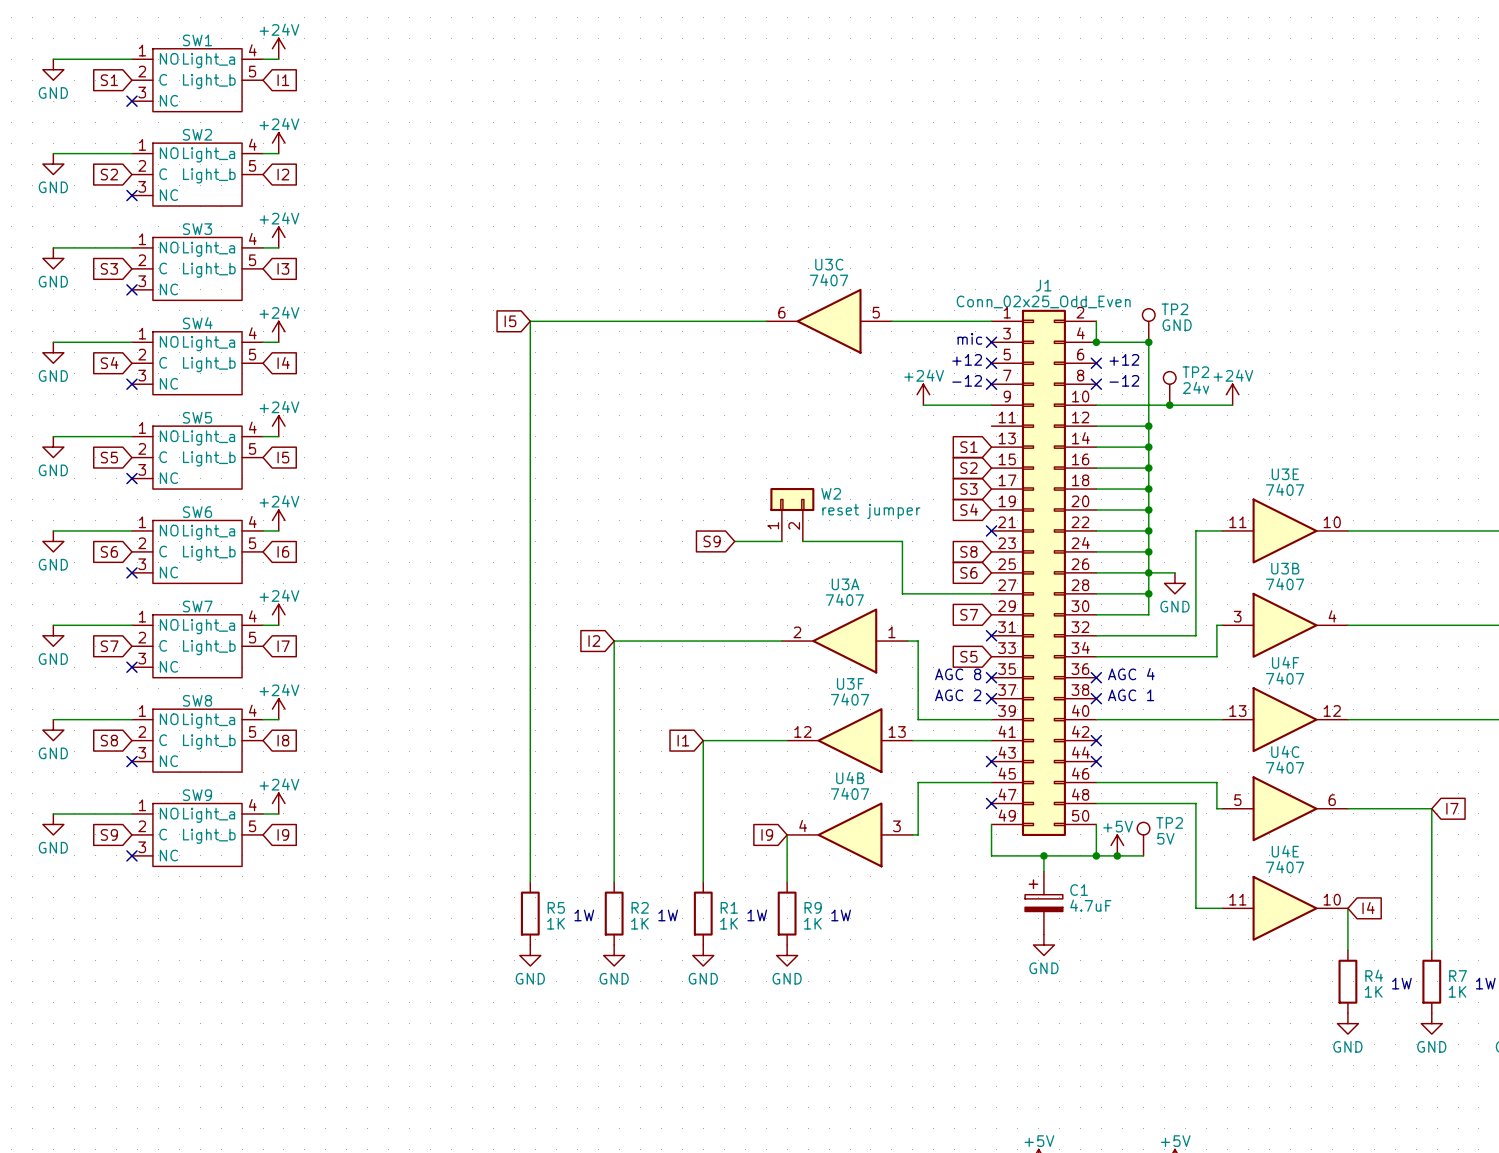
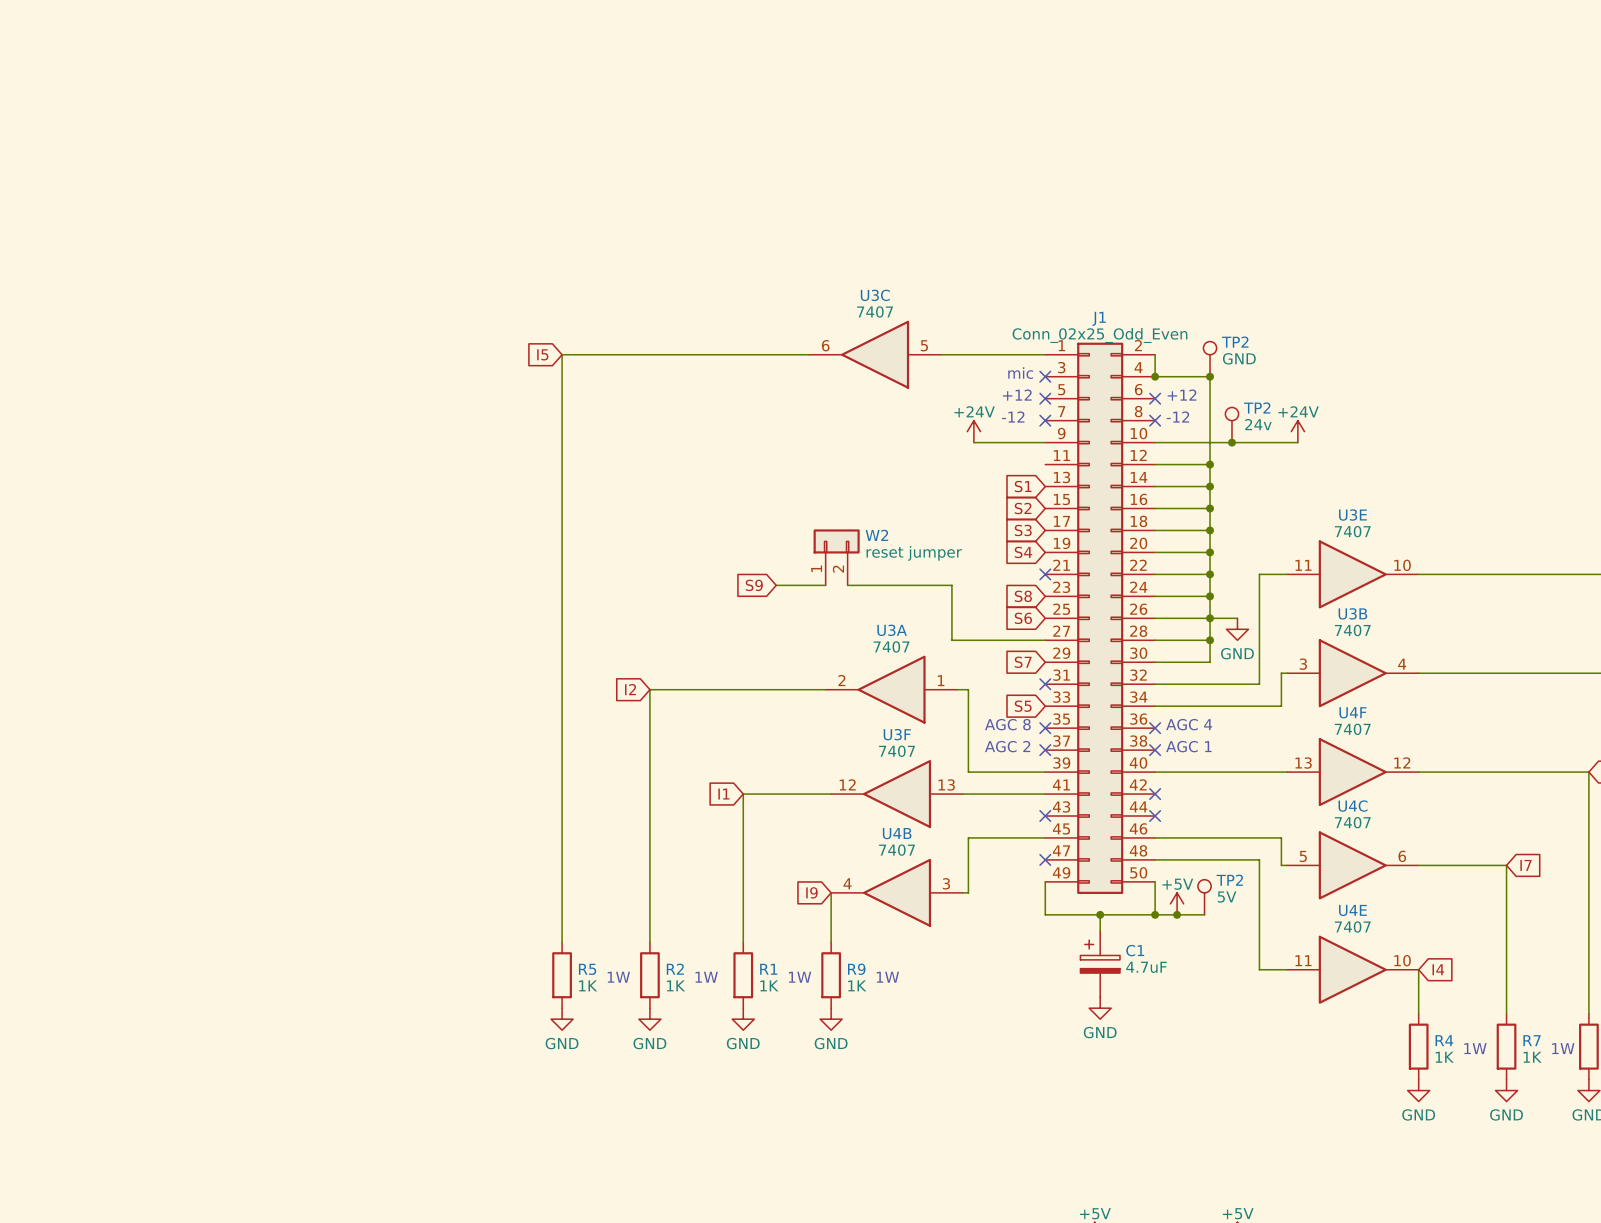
power symbol: +24V (278, 48) -> none
wire: (53, 59) (131, 59) -> none
wire: (263, 59) (278, 59) -> none
power symbol: GND (53, 69) -> none
global label: S1 (109, 80) -> none
SW1: (197, 80) -> none
global label: I1 (283, 80) -> none
no-connect mark: (131, 101) -> none
power symbol: +24V (278, 143) -> none
wire: (53, 153) (131, 153) -> none
wire: (263, 153) (278, 153) -> none
power symbol: GND (53, 164) -> none
global label: S2 (109, 174) -> none
SW2: (197, 174) -> none
global label: I2 (283, 174) -> none
no-connect mark: (131, 195) -> none
power symbol: +24V (278, 237) -> none
wire: (53, 247) (131, 247) -> none
wire: (263, 247) (278, 247) -> none
power symbol: GND (53, 258) -> none
global label: S3 (109, 268) -> none
SW3: (197, 268) -> none
global label: I3 (283, 268) -> none
no-connect mark: (131, 289) -> none
power symbol: +24V (278, 331) -> none
wire: (53, 342) (131, 342) -> none
wire: (263, 342) (278, 342) -> none
power symbol: GND (53, 352) -> none
global label: S4 (109, 362) -> none
global label: I4 (283, 362) -> none
SW4: (197, 363) -> none
no-connect mark: (131, 384) -> none
power symbol: +24V (278, 426) -> none
wire: (53, 436) (131, 436) -> none
wire: (263, 436) (278, 436) -> none
power symbol: GND (53, 447) -> none
global label: S5 (109, 457) -> none
SW5: (197, 457) -> none
global label: I5 (283, 457) -> none
no-connect mark: (131, 478) -> none
power symbol: +24V (278, 520) -> none
wire: (53, 530) (131, 530) -> none
wire: (263, 530) (278, 530) -> none
power symbol: GND (53, 541) -> none
global label: S6 (109, 551) -> none
SW6: (197, 551) -> none
global label: I6 (283, 551) -> none
no-connect mark: (131, 572) -> none
power symbol: +24V (278, 614) -> none
wire: (53, 625) (131, 625) -> none
wire: (263, 625) (278, 625) -> none
power symbol: GND (53, 635) -> none
global label: S7 (109, 646) -> none
SW7: (197, 646) -> none
global label: I7 (283, 646) -> none
no-connect mark: (131, 667) -> none
power symbol: +24V (278, 709) -> none
wire: (53, 719) (131, 719) -> none
wire: (263, 719) (278, 719) -> none
power symbol: GND (53, 730) -> none
global label: S8 (109, 740) -> none
SW8: (197, 740) -> none
global label: I8 (283, 740) -> none
no-connect mark: (131, 761) -> none
power symbol: +24V (278, 803) -> none
wire: (53, 813) (131, 813) -> none
wire: (263, 813) (278, 813) -> none
power symbol: GND (53, 824) -> none
global label: S9 (109, 834) -> none
SW9: (197, 834) -> none
global label: I9 (283, 834) -> none
no-connect mark: (131, 855) -> none

